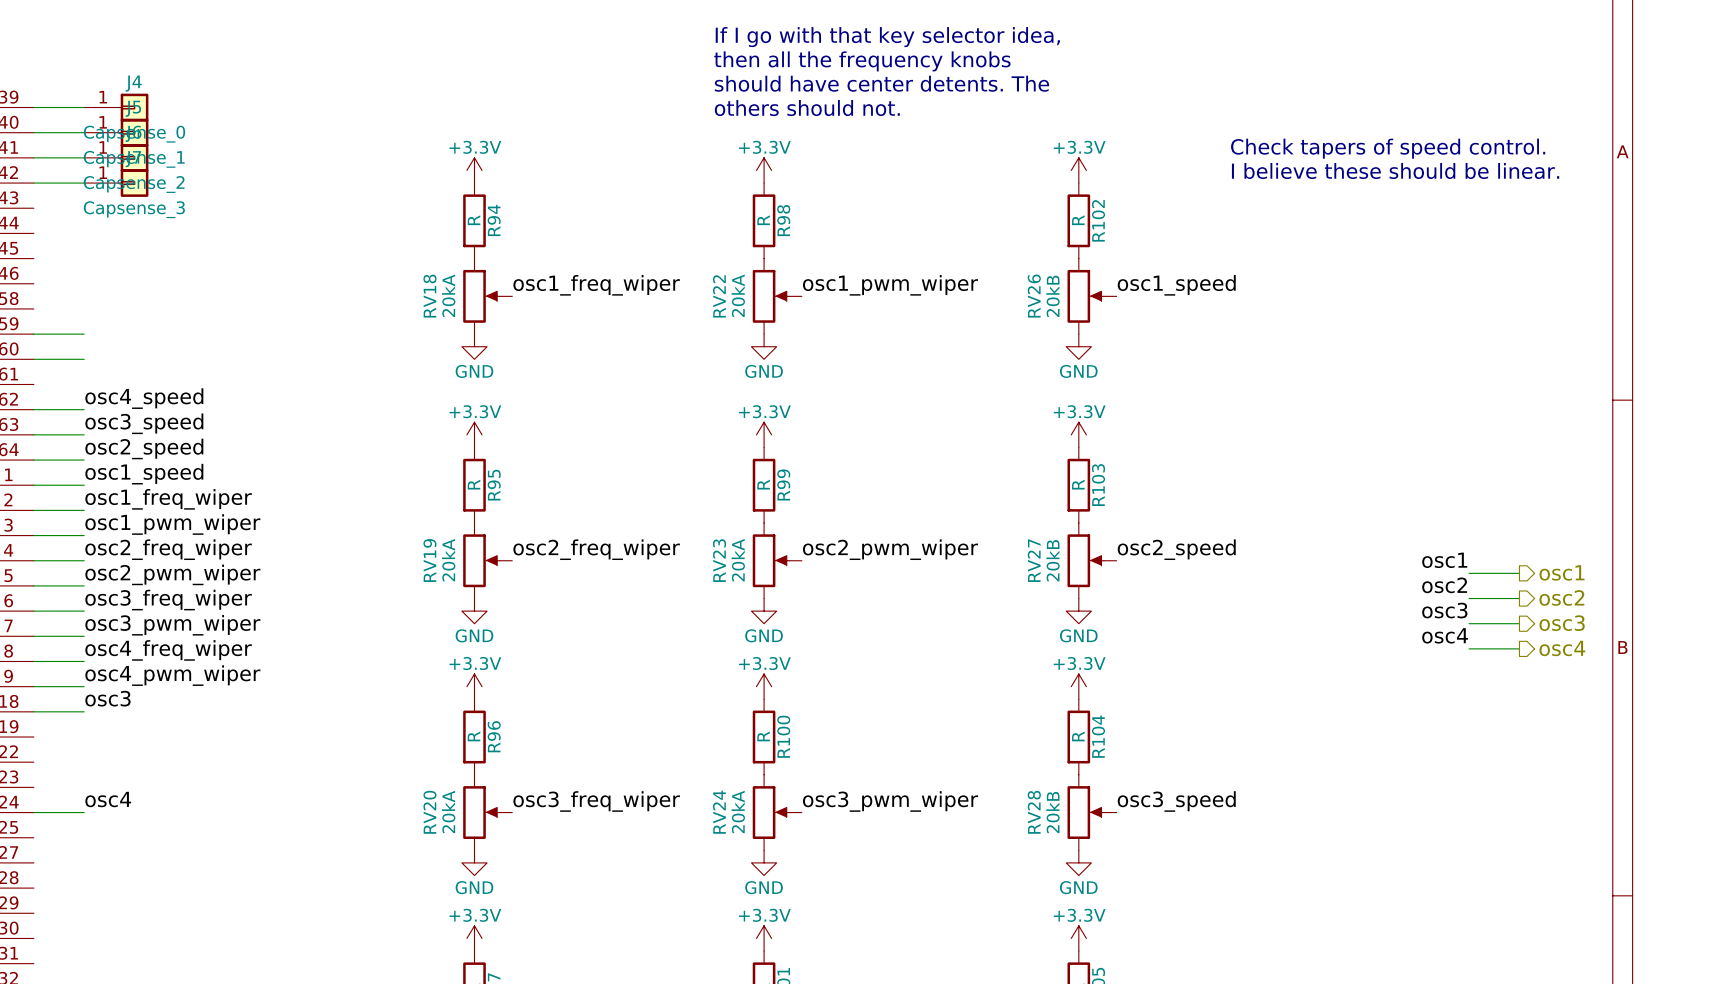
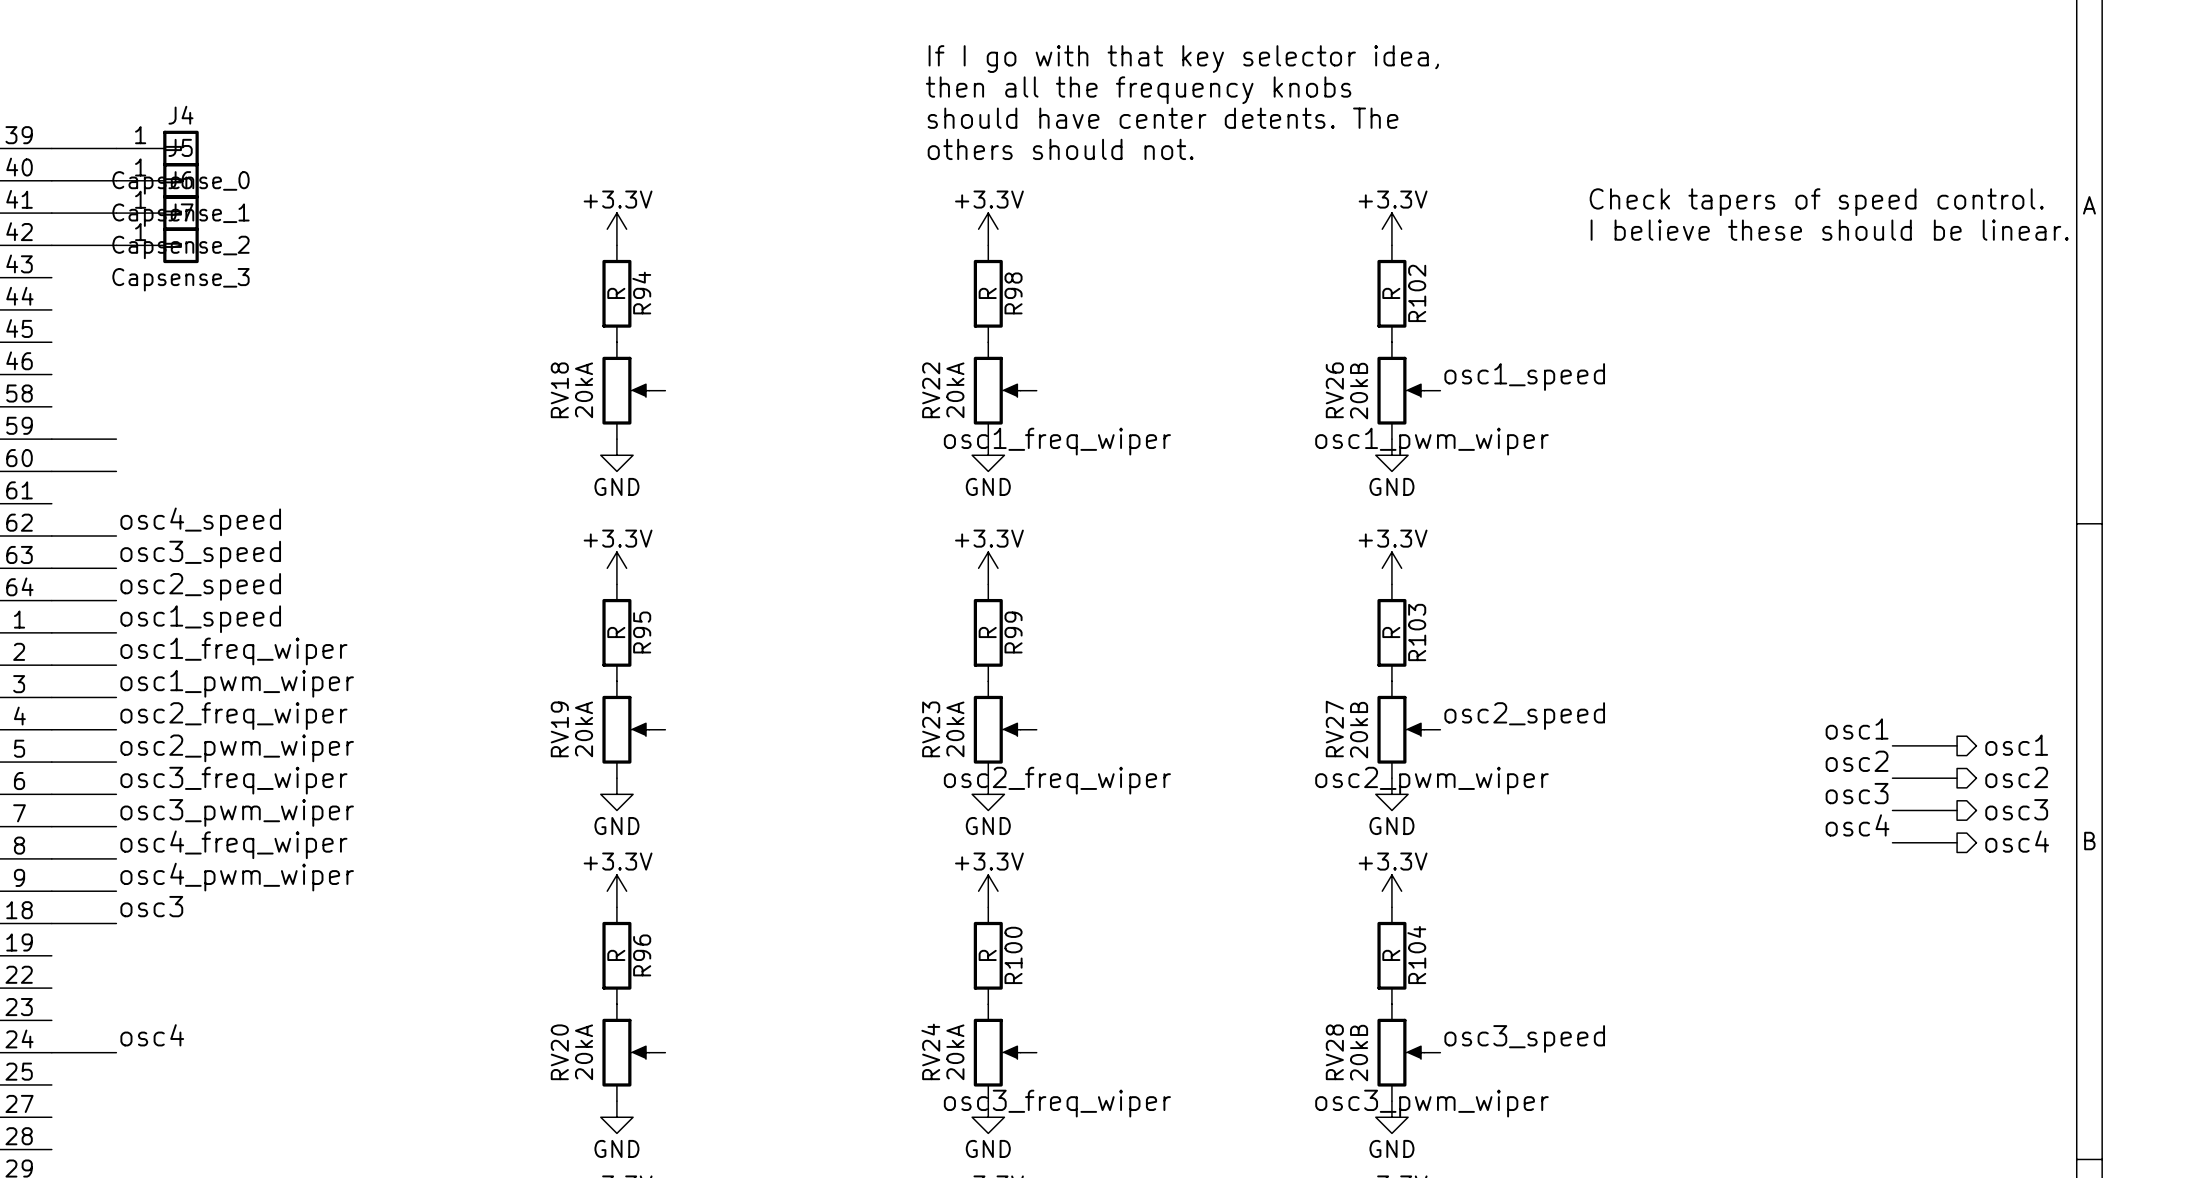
label position: osc1_freq_wiper (596, 285) -> osc1_freq_wiper (1057, 441)
label position: osc1_pwm_wiper (890, 285) -> osc1_pwm_wiper (1431, 441)
label position: osc2_freq_wiper (596, 549) -> osc2_freq_wiper (1057, 780)
label position: osc2_pwm_wiper (890, 549) -> osc2_pwm_wiper (1431, 780)
label position: osc3_freq_wiper (596, 801) -> osc3_freq_wiper (1057, 1103)
label position: osc3_pwm_wiper (890, 801) -> osc3_pwm_wiper (1431, 1103)

